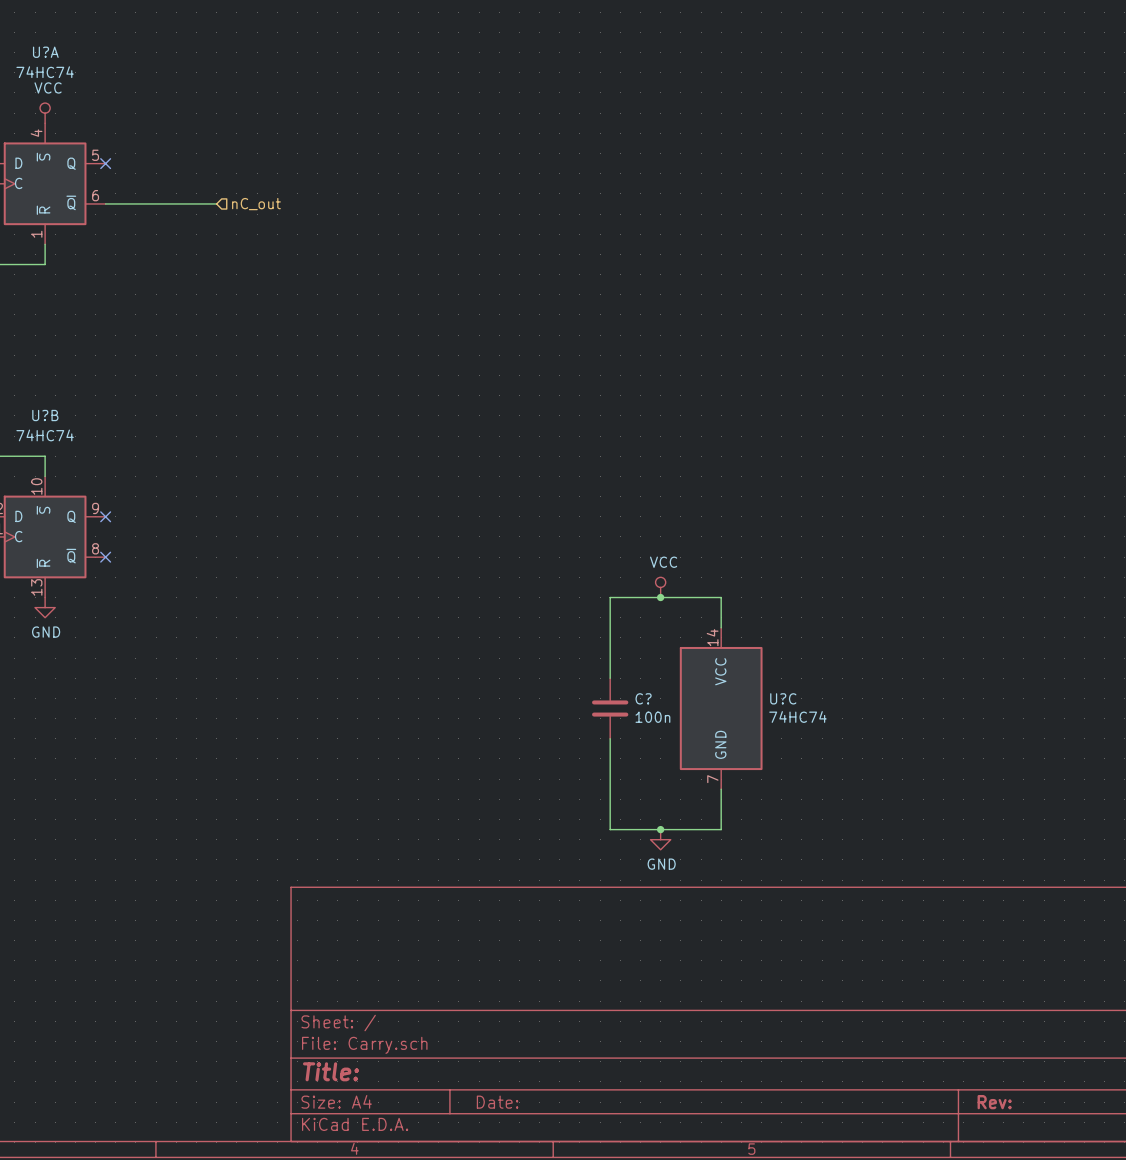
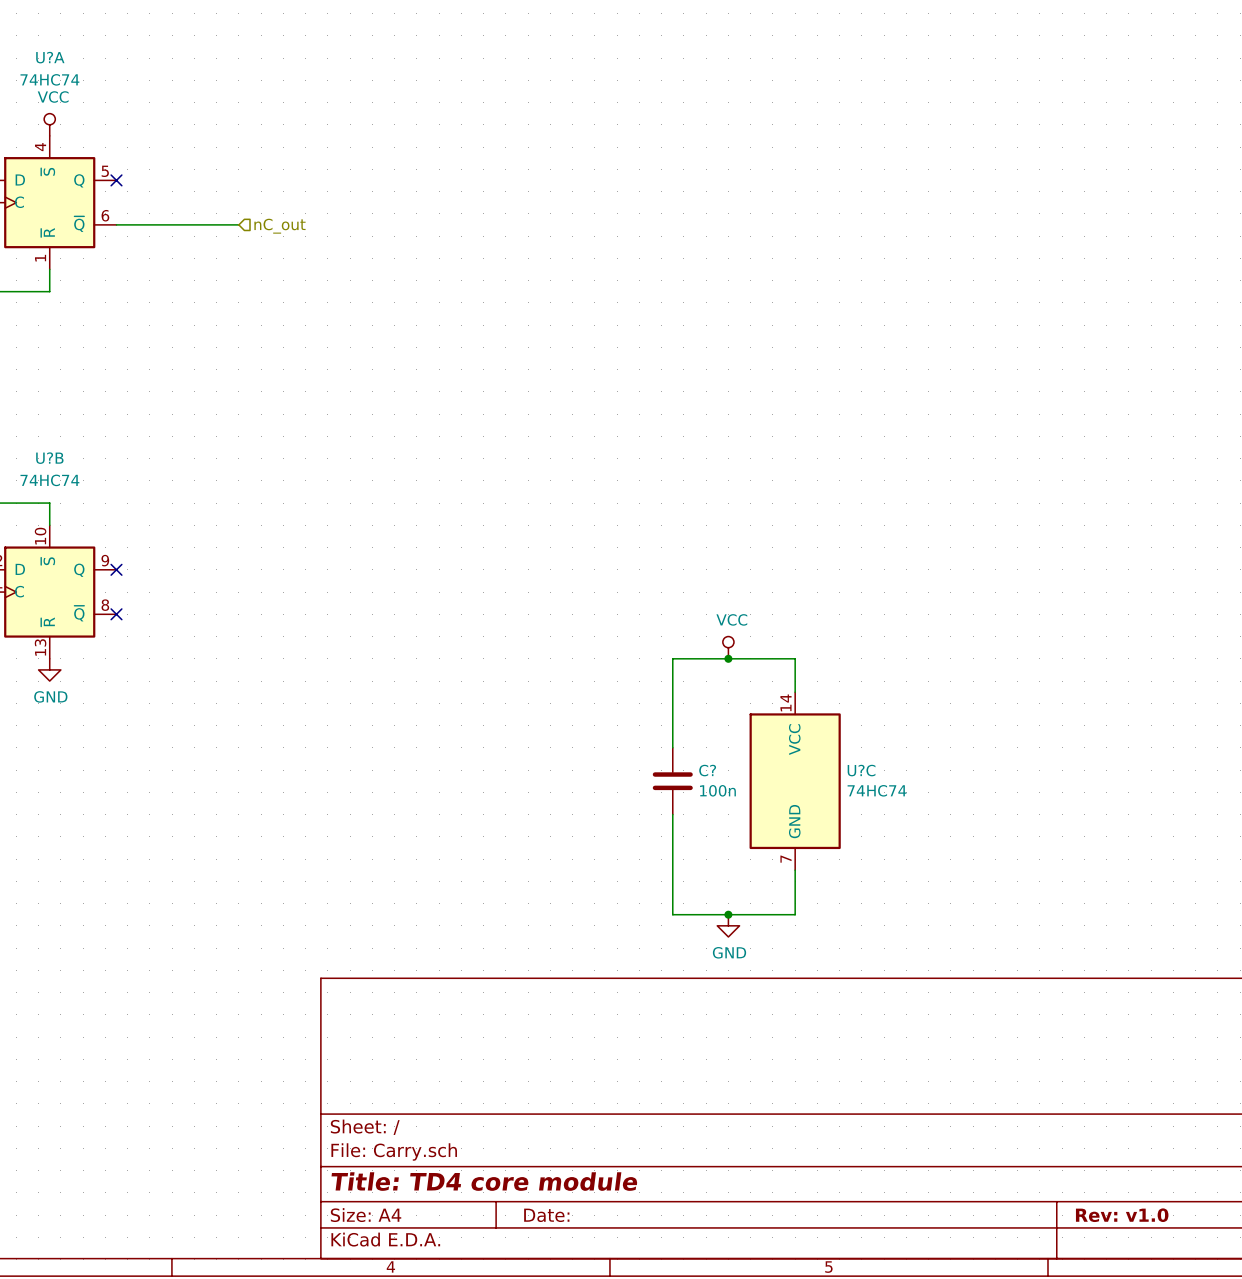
title block: Title: (331, 1071) -> Title: TD4 core module (484, 1181)
title block: Rev: (994, 1102) -> Rev: v1.0 (1122, 1215)

